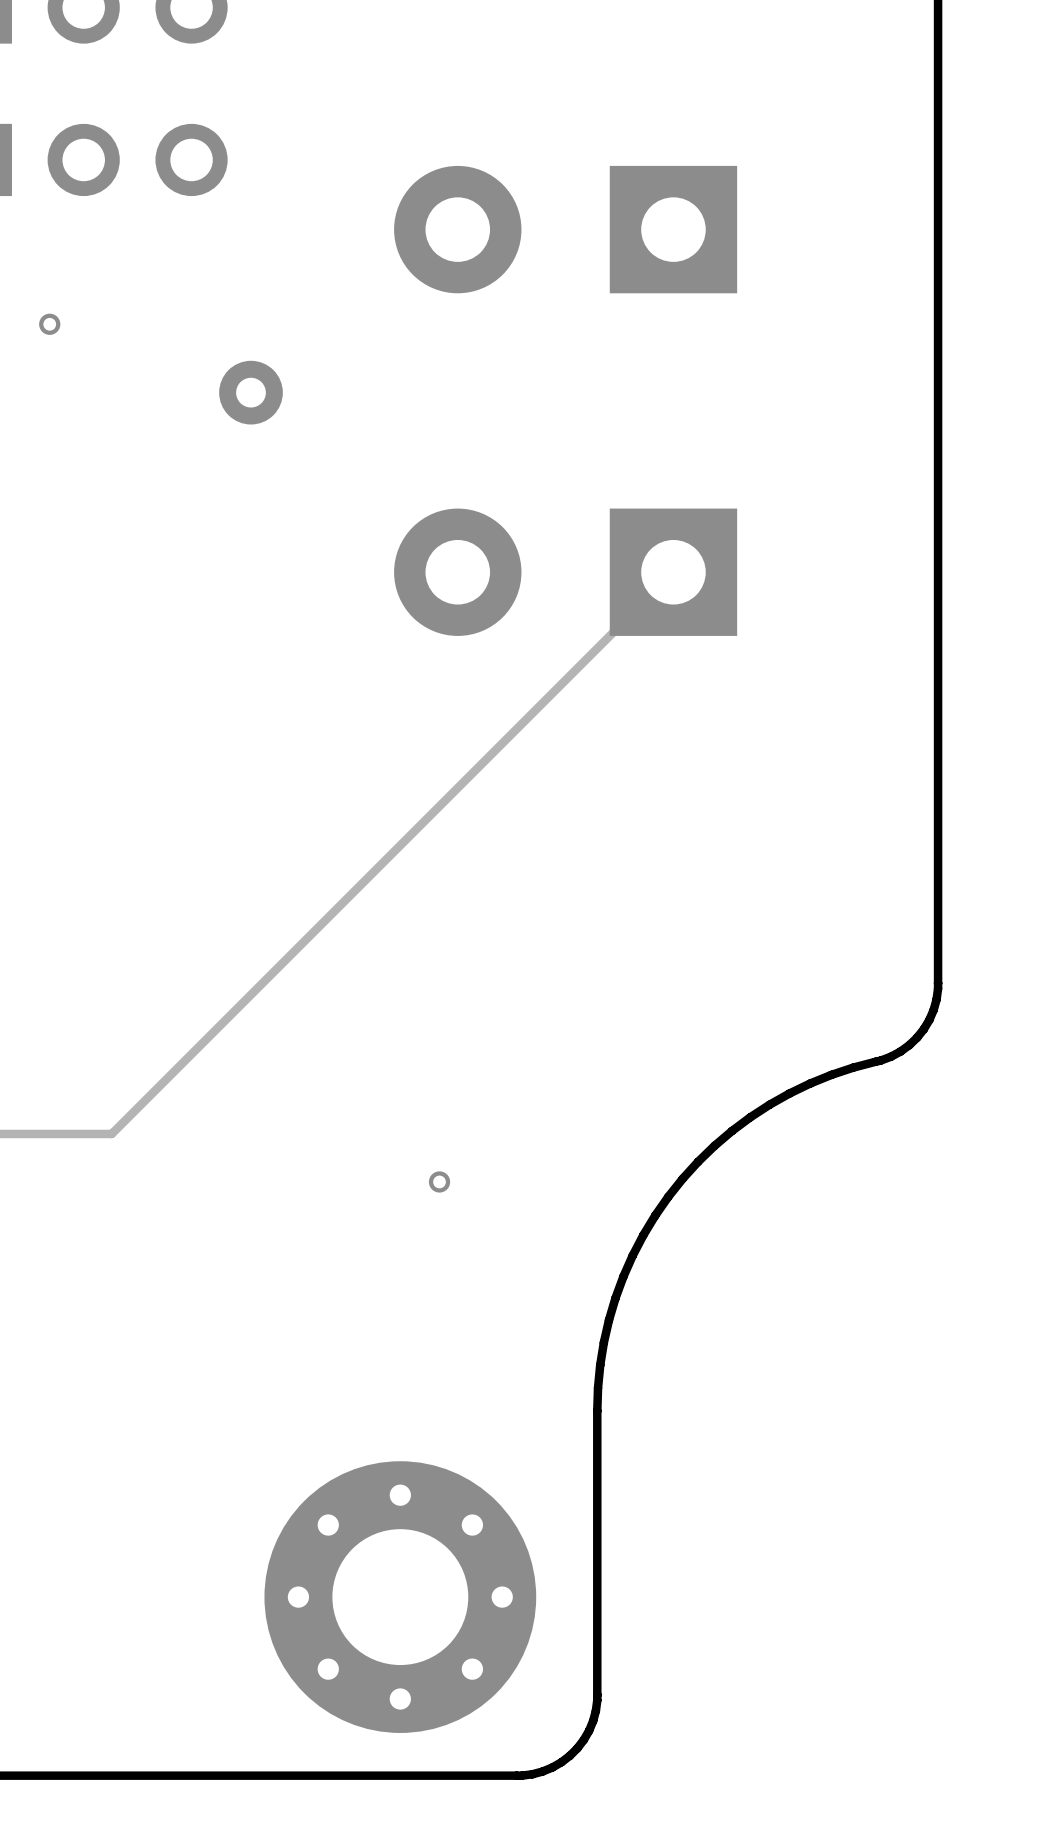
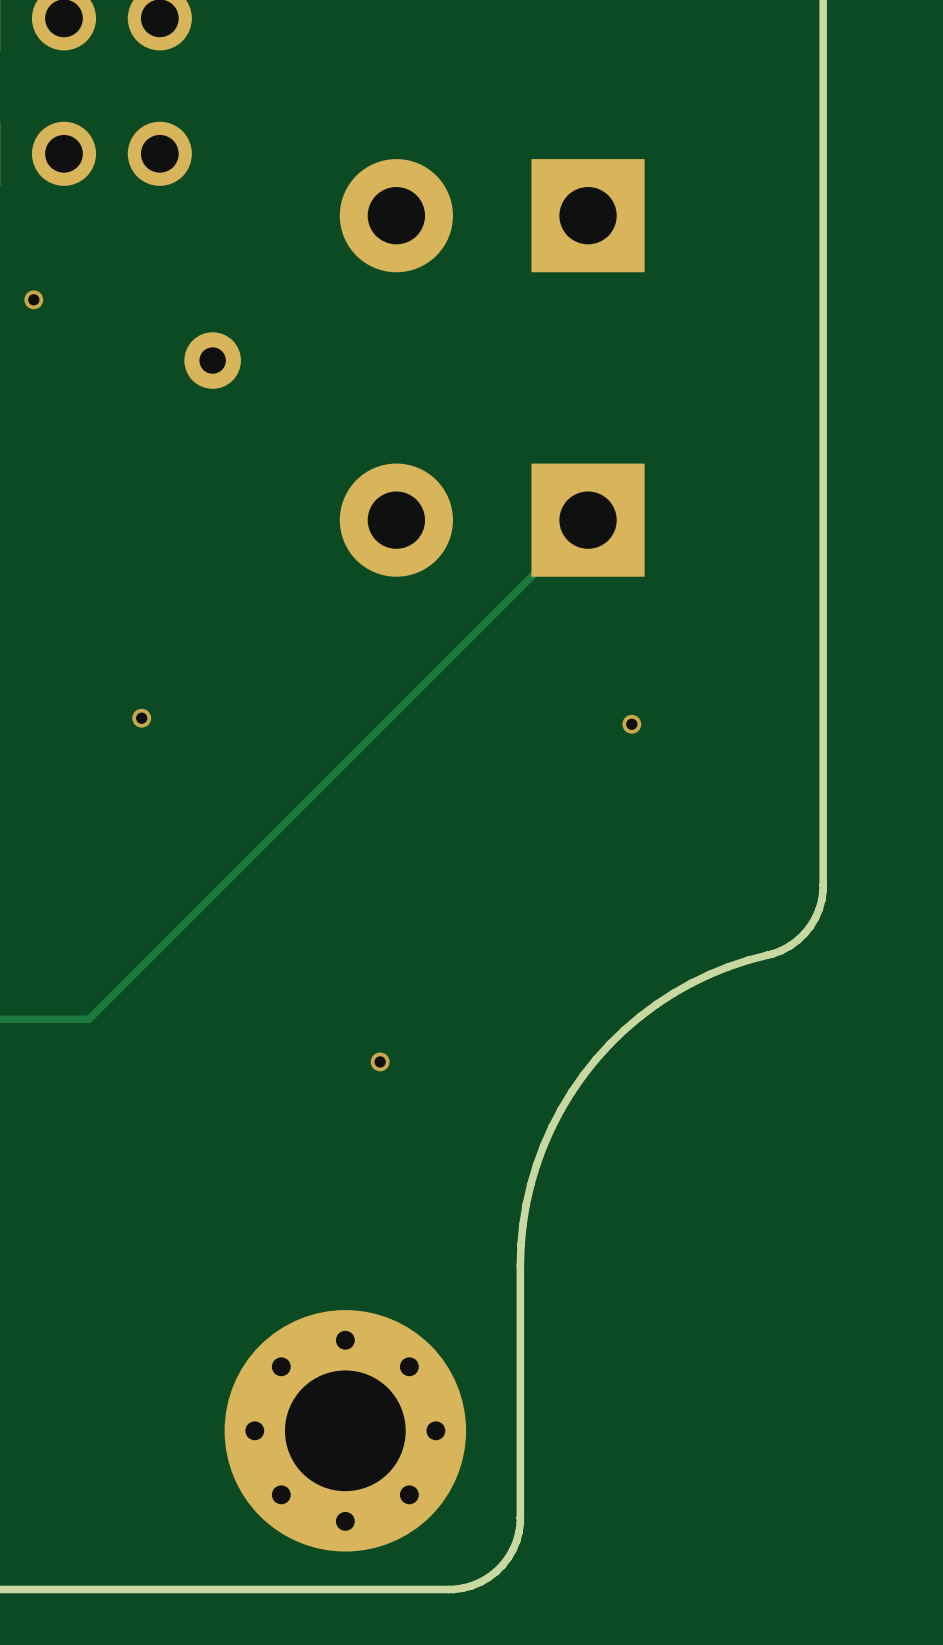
via: none -> (141, 718)
via: none -> (631, 724)

